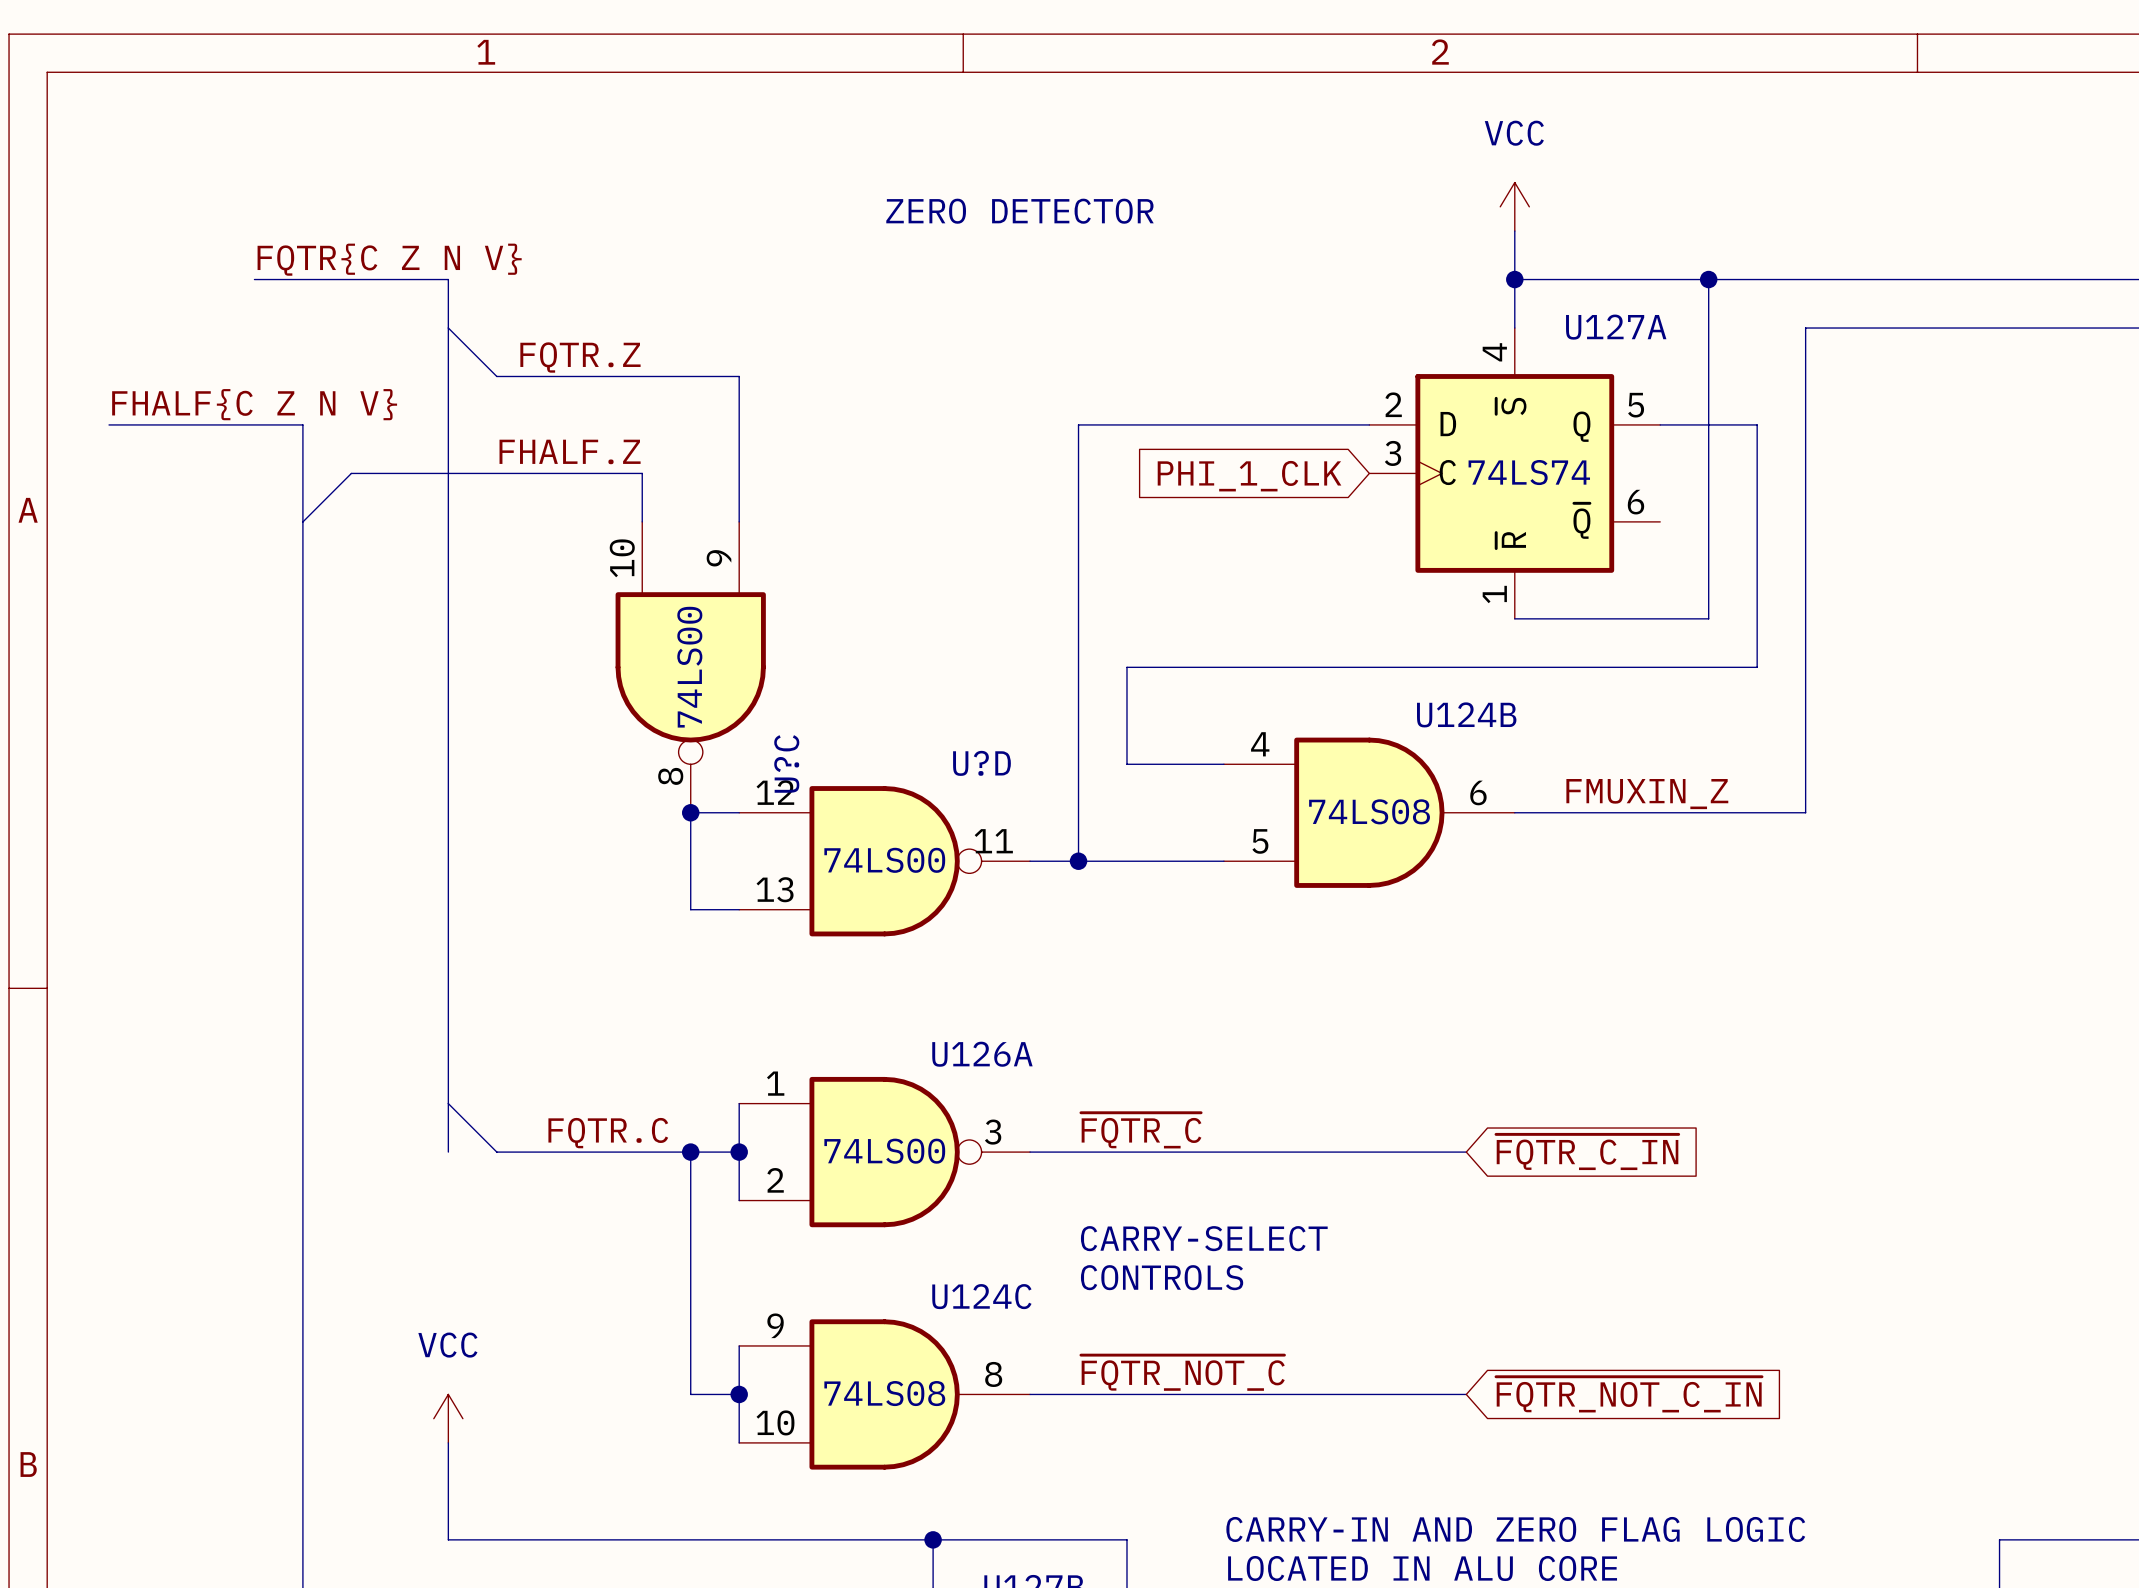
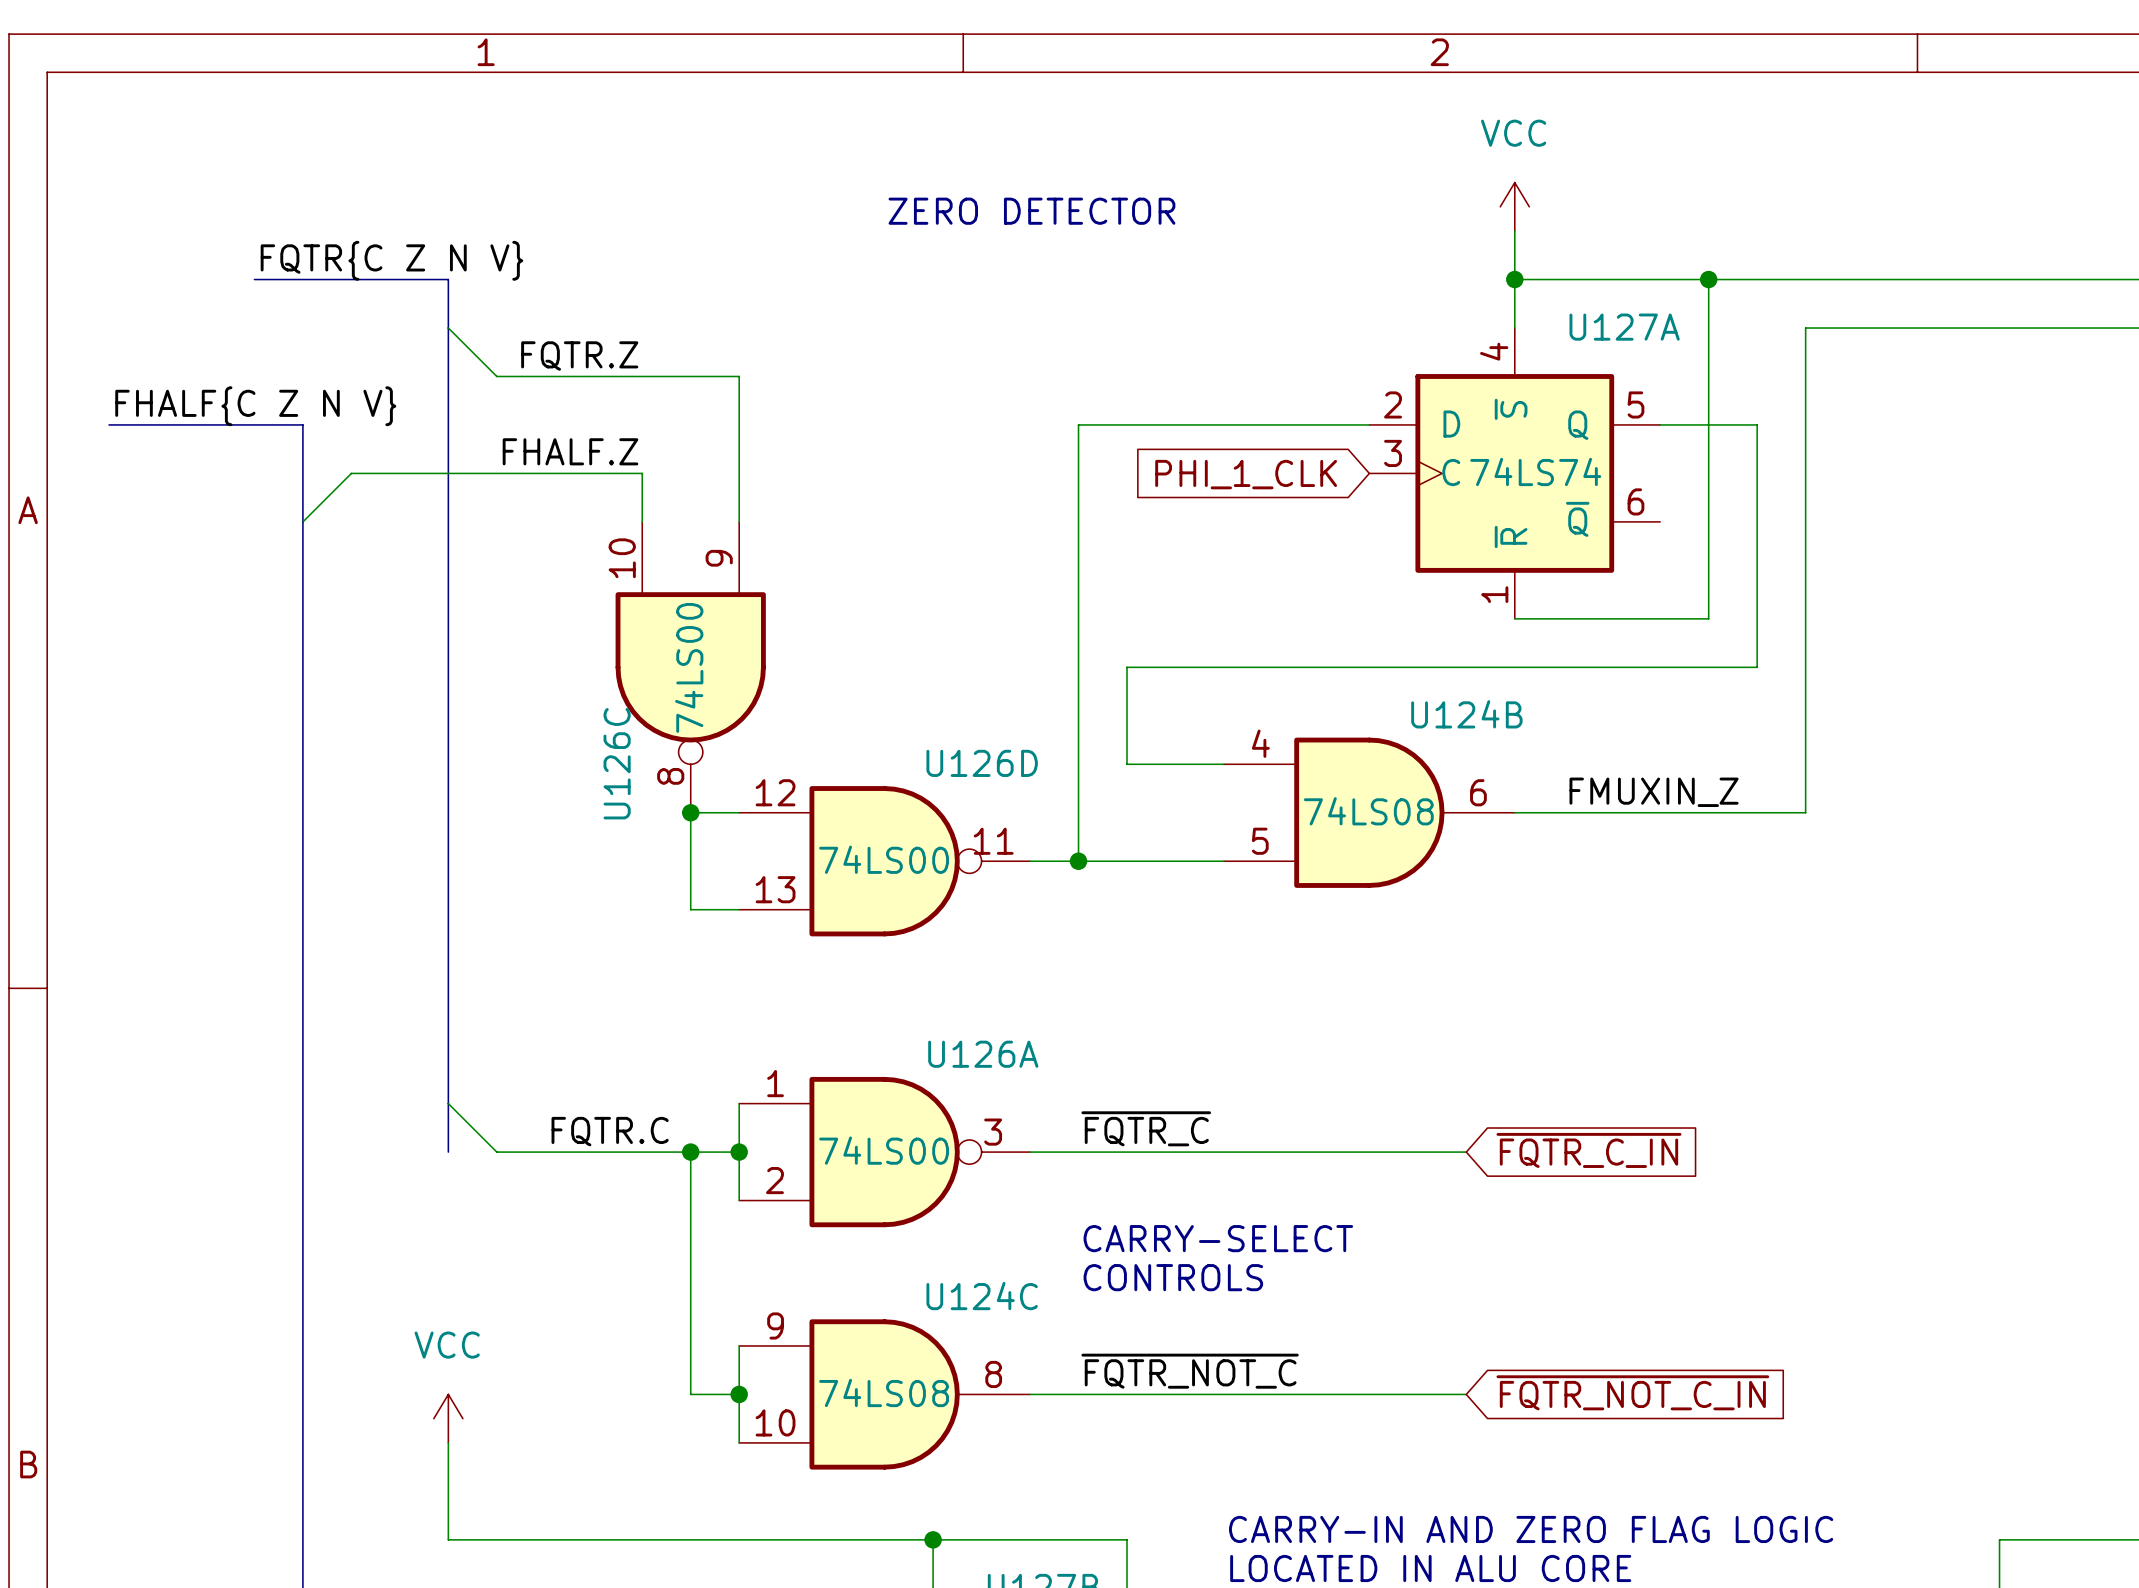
U?C name: U?C (786, 763) -> U126C (617, 763)
U?D name: U?D (981, 763) -> U126D (982, 763)

